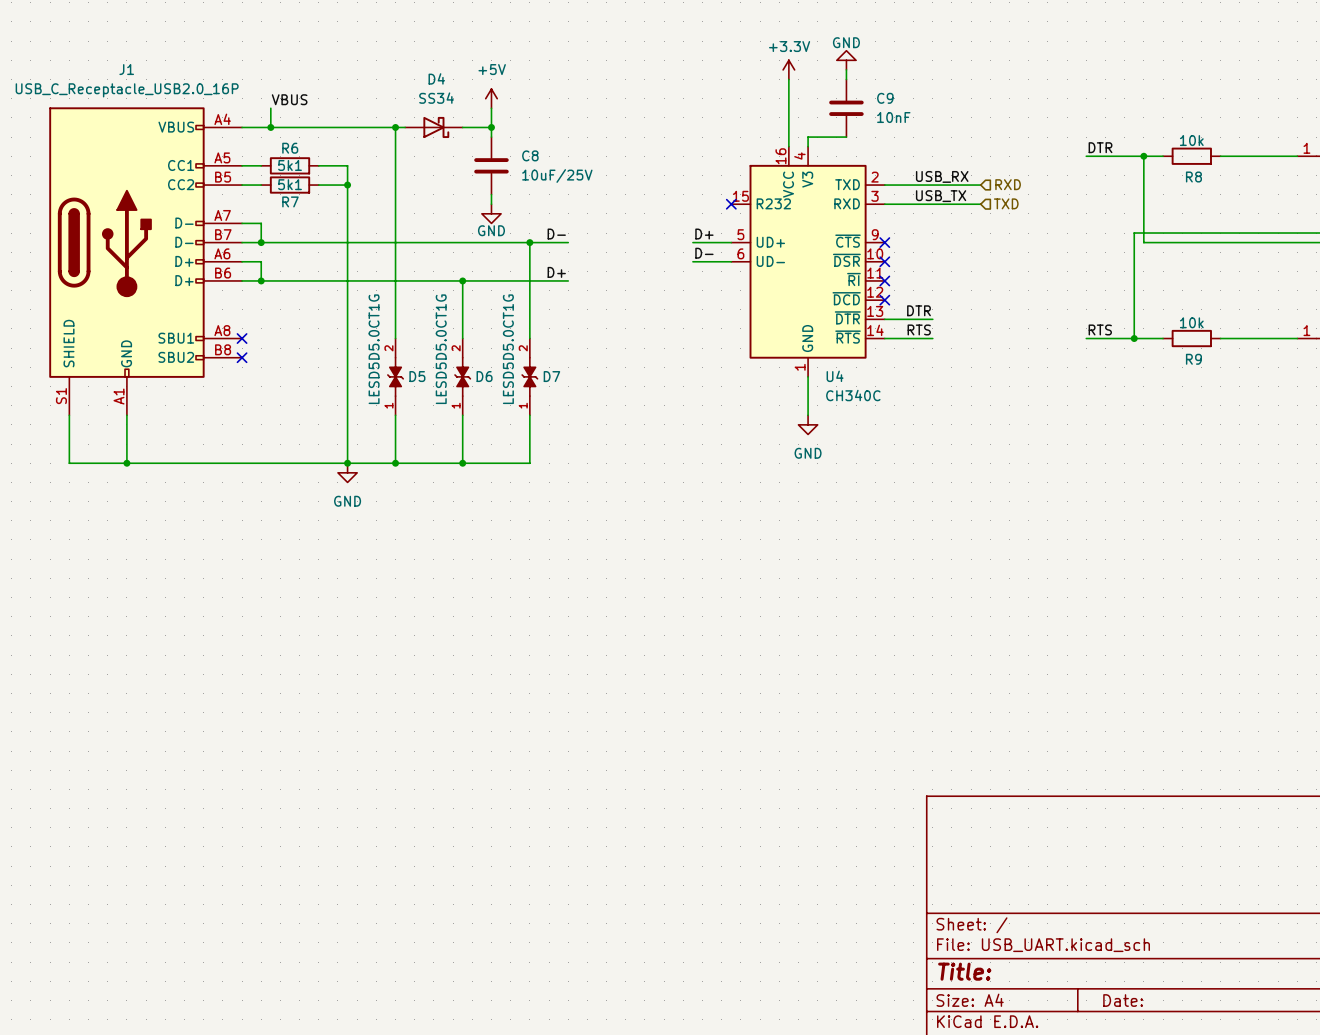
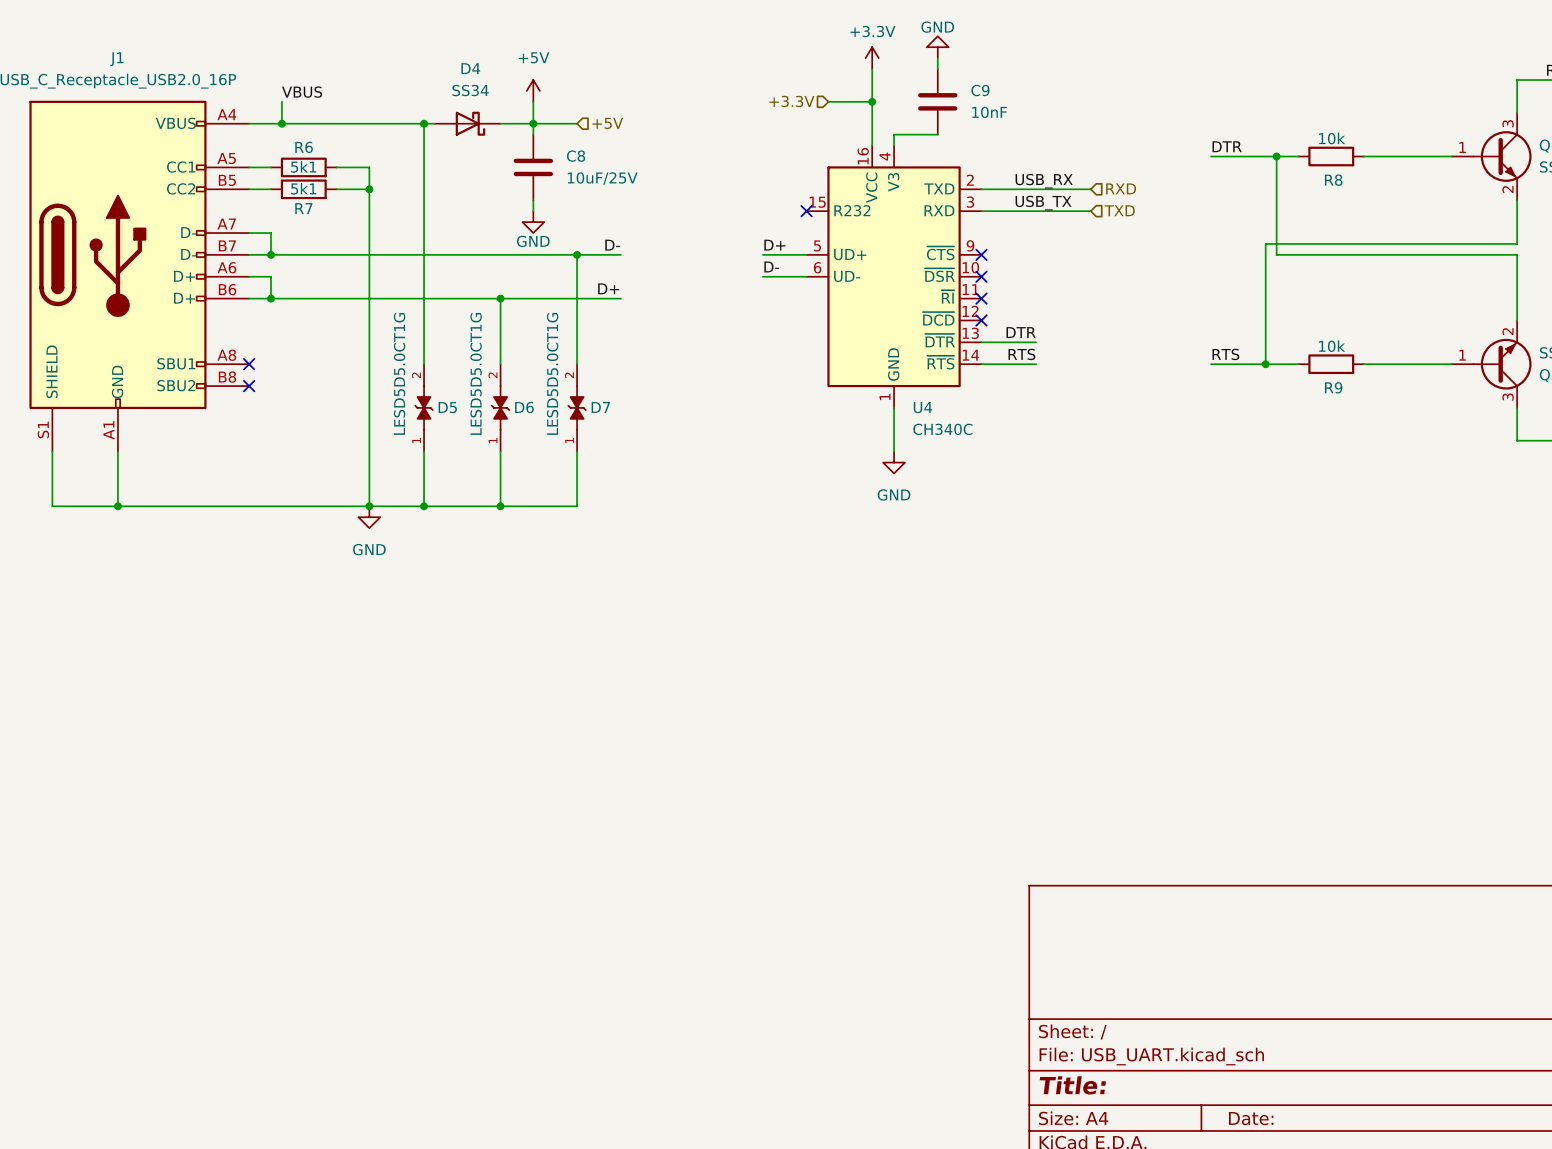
hierarchical label: none -> +3.3V (791, 101)
wire: none -> (828, 101) (872, 101)
junction: none -> (872, 101)
wire: none -> (533, 123) (577, 123)
hierarchical label: none -> +5V (607, 123)

